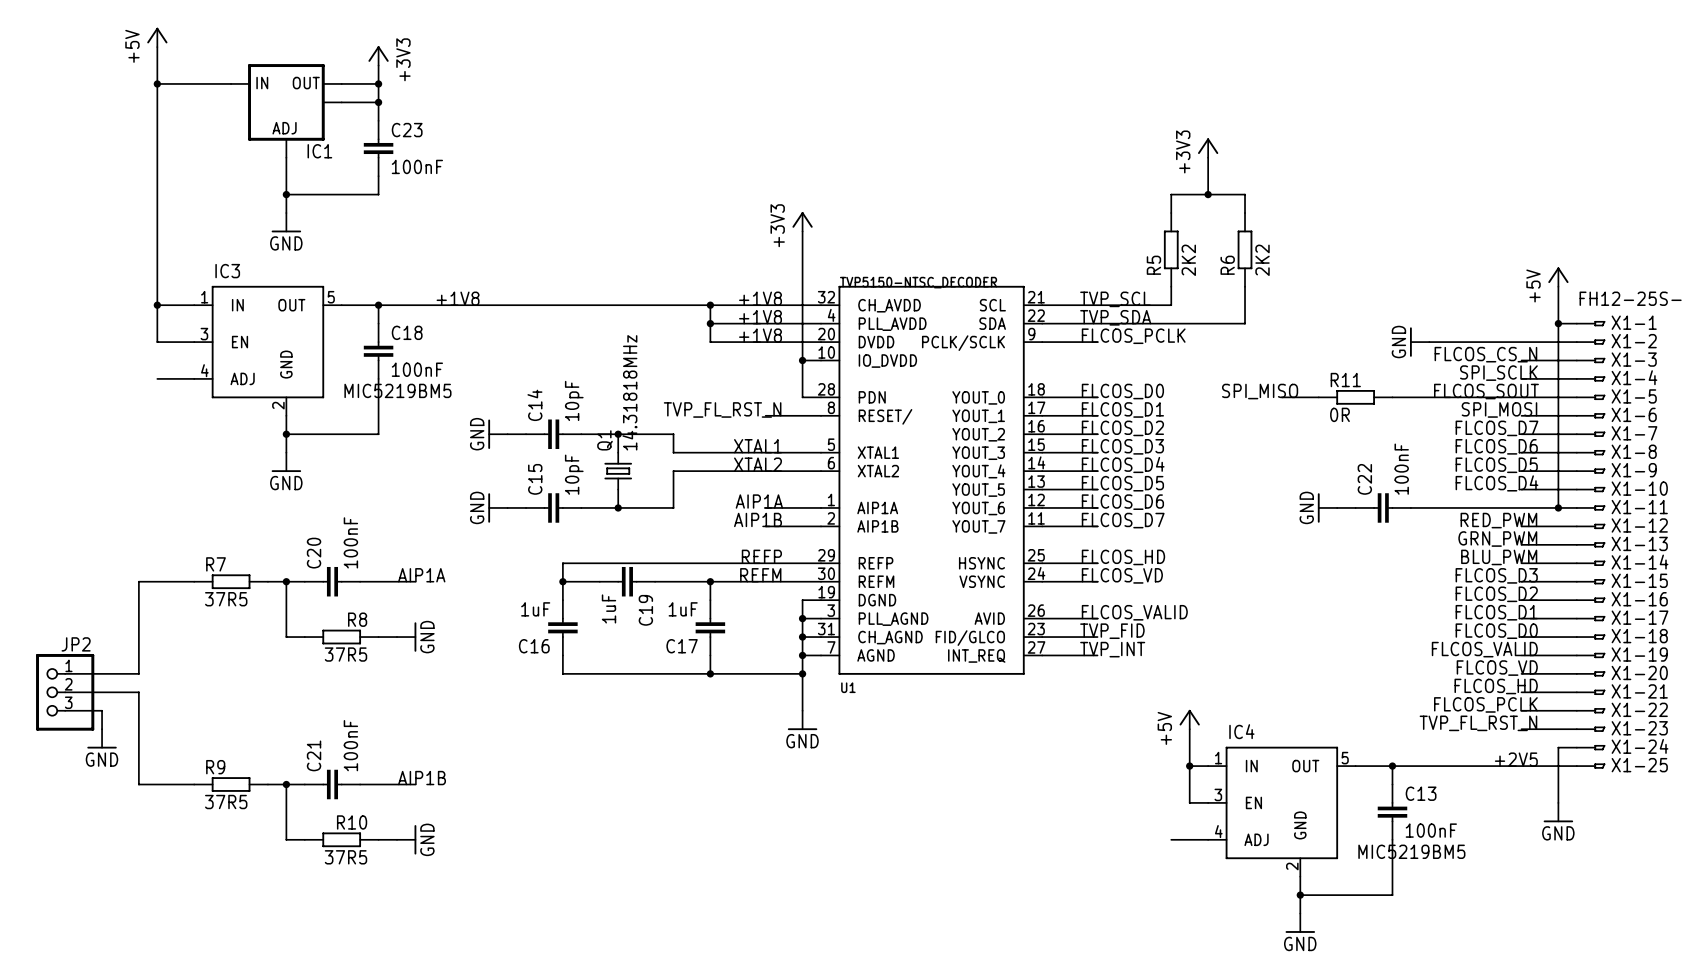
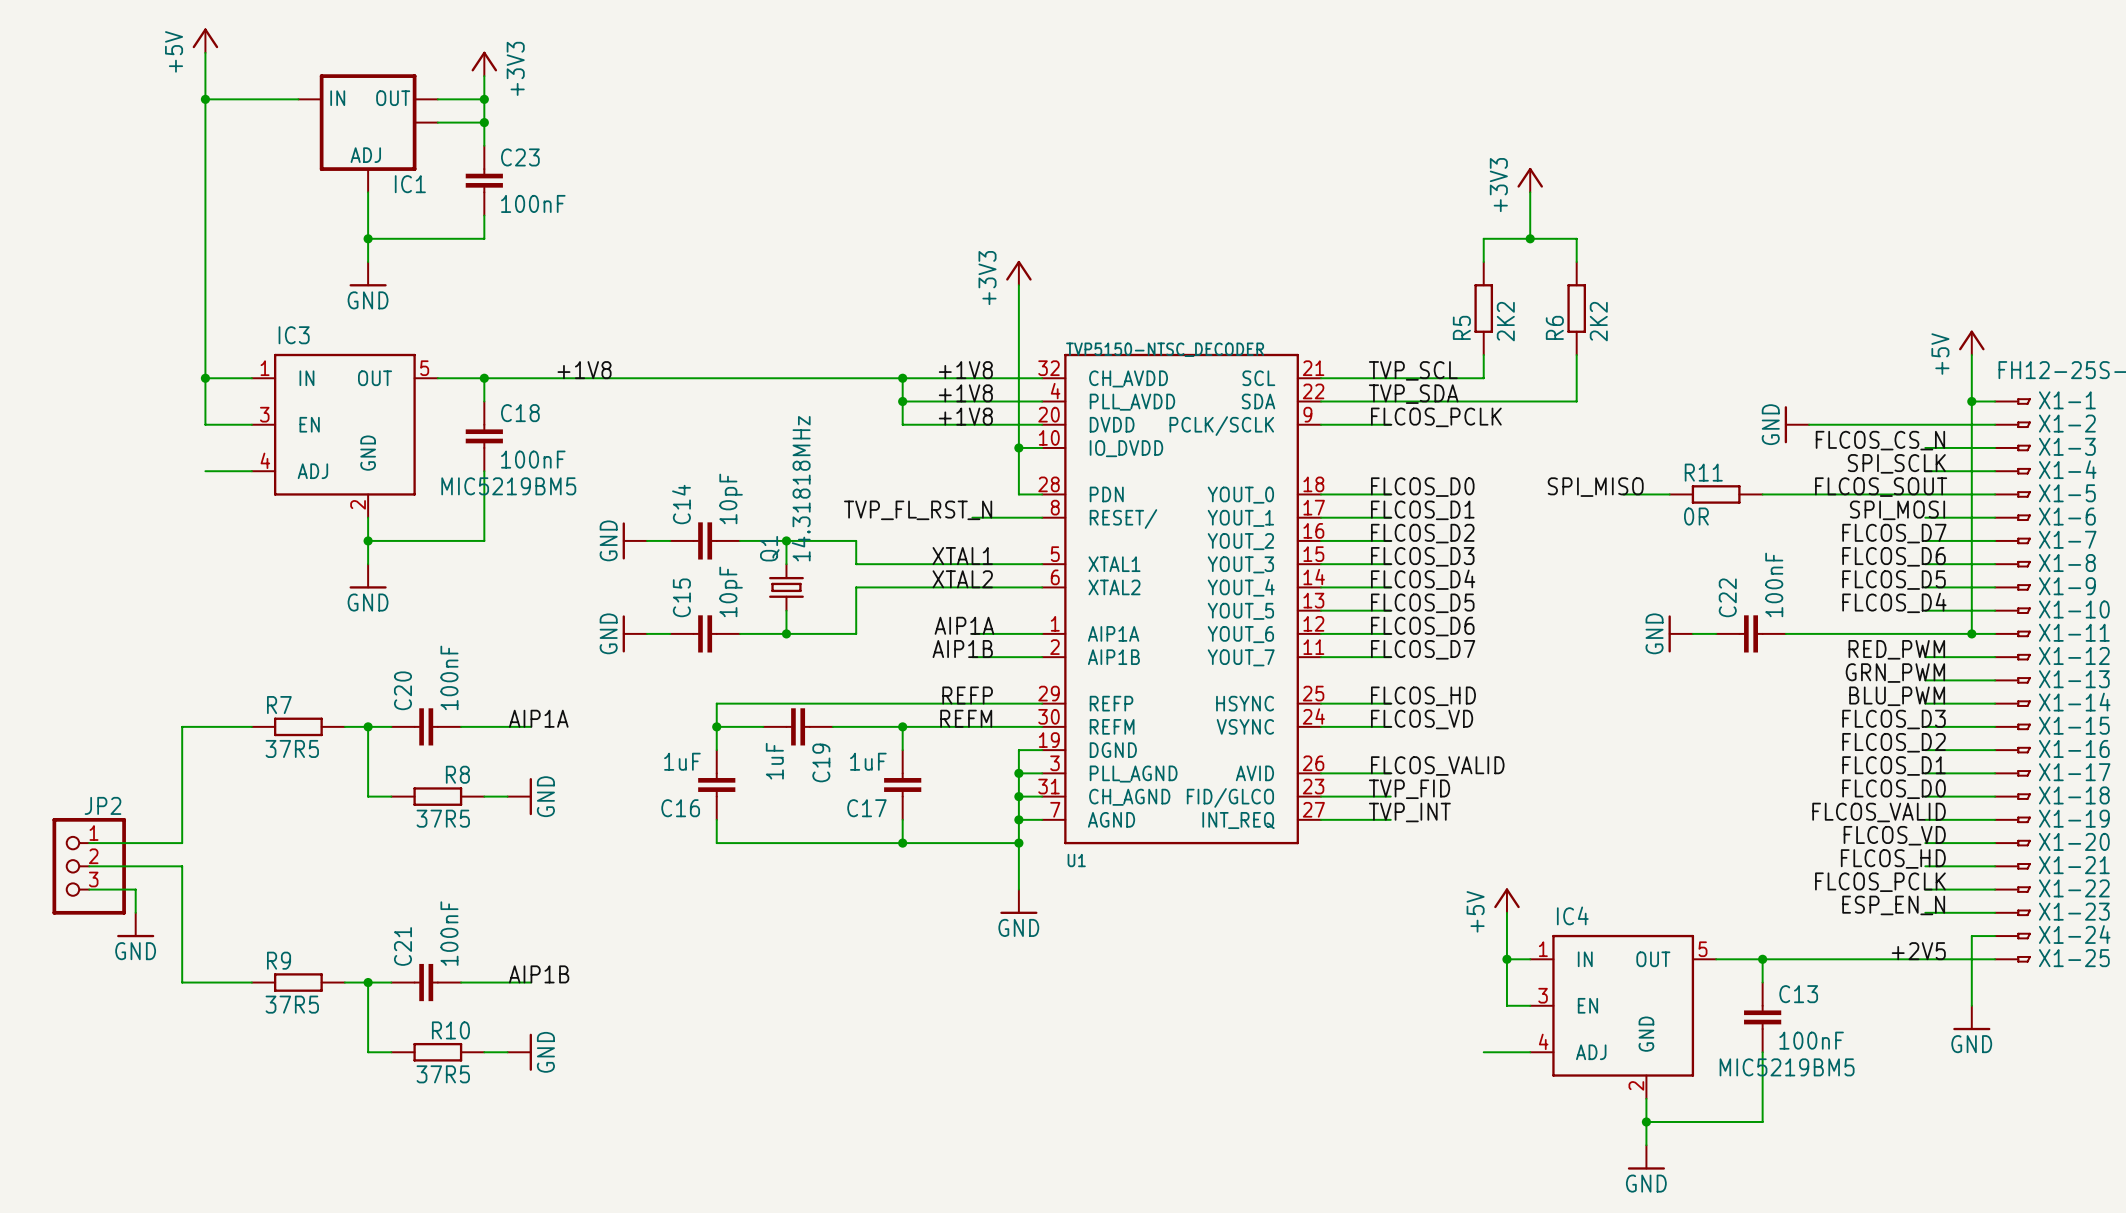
label: TVP_FL_RST_N (1478, 723) -> ESP_EN_N (1893, 905)

